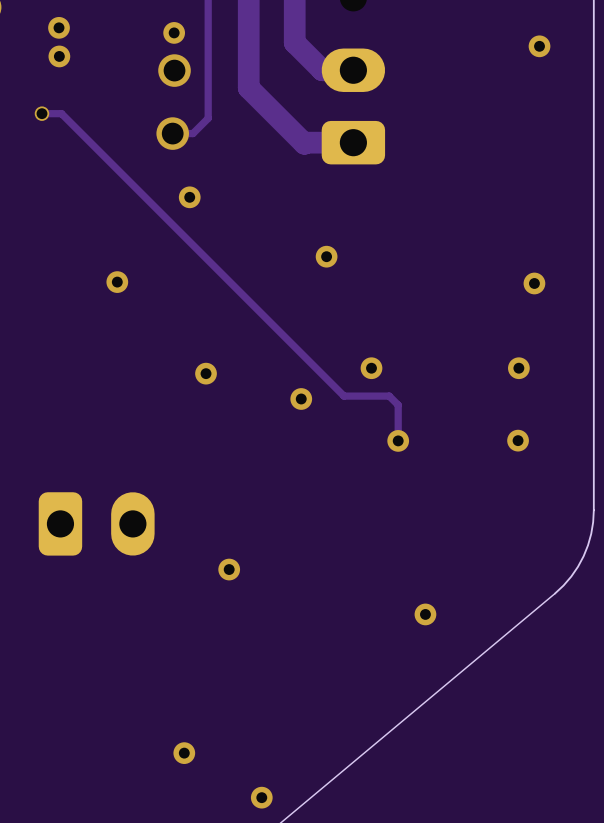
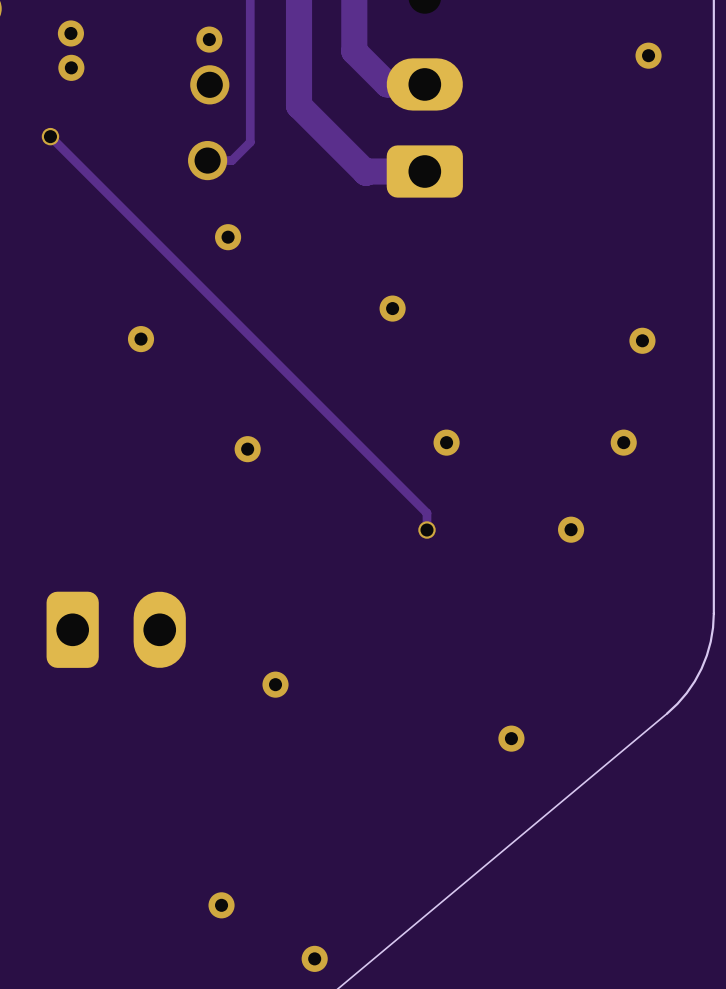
track: (41, 113) (61, 113) (343, 396) (389, 396) (398, 405) (398, 440) -> (50, 136) (426, 513) (426, 530)
via: (301, 398) -> none
via: none -> (426, 530)
via: (398, 440) -> none
via: none -> (571, 529)
via: (518, 440) -> none

